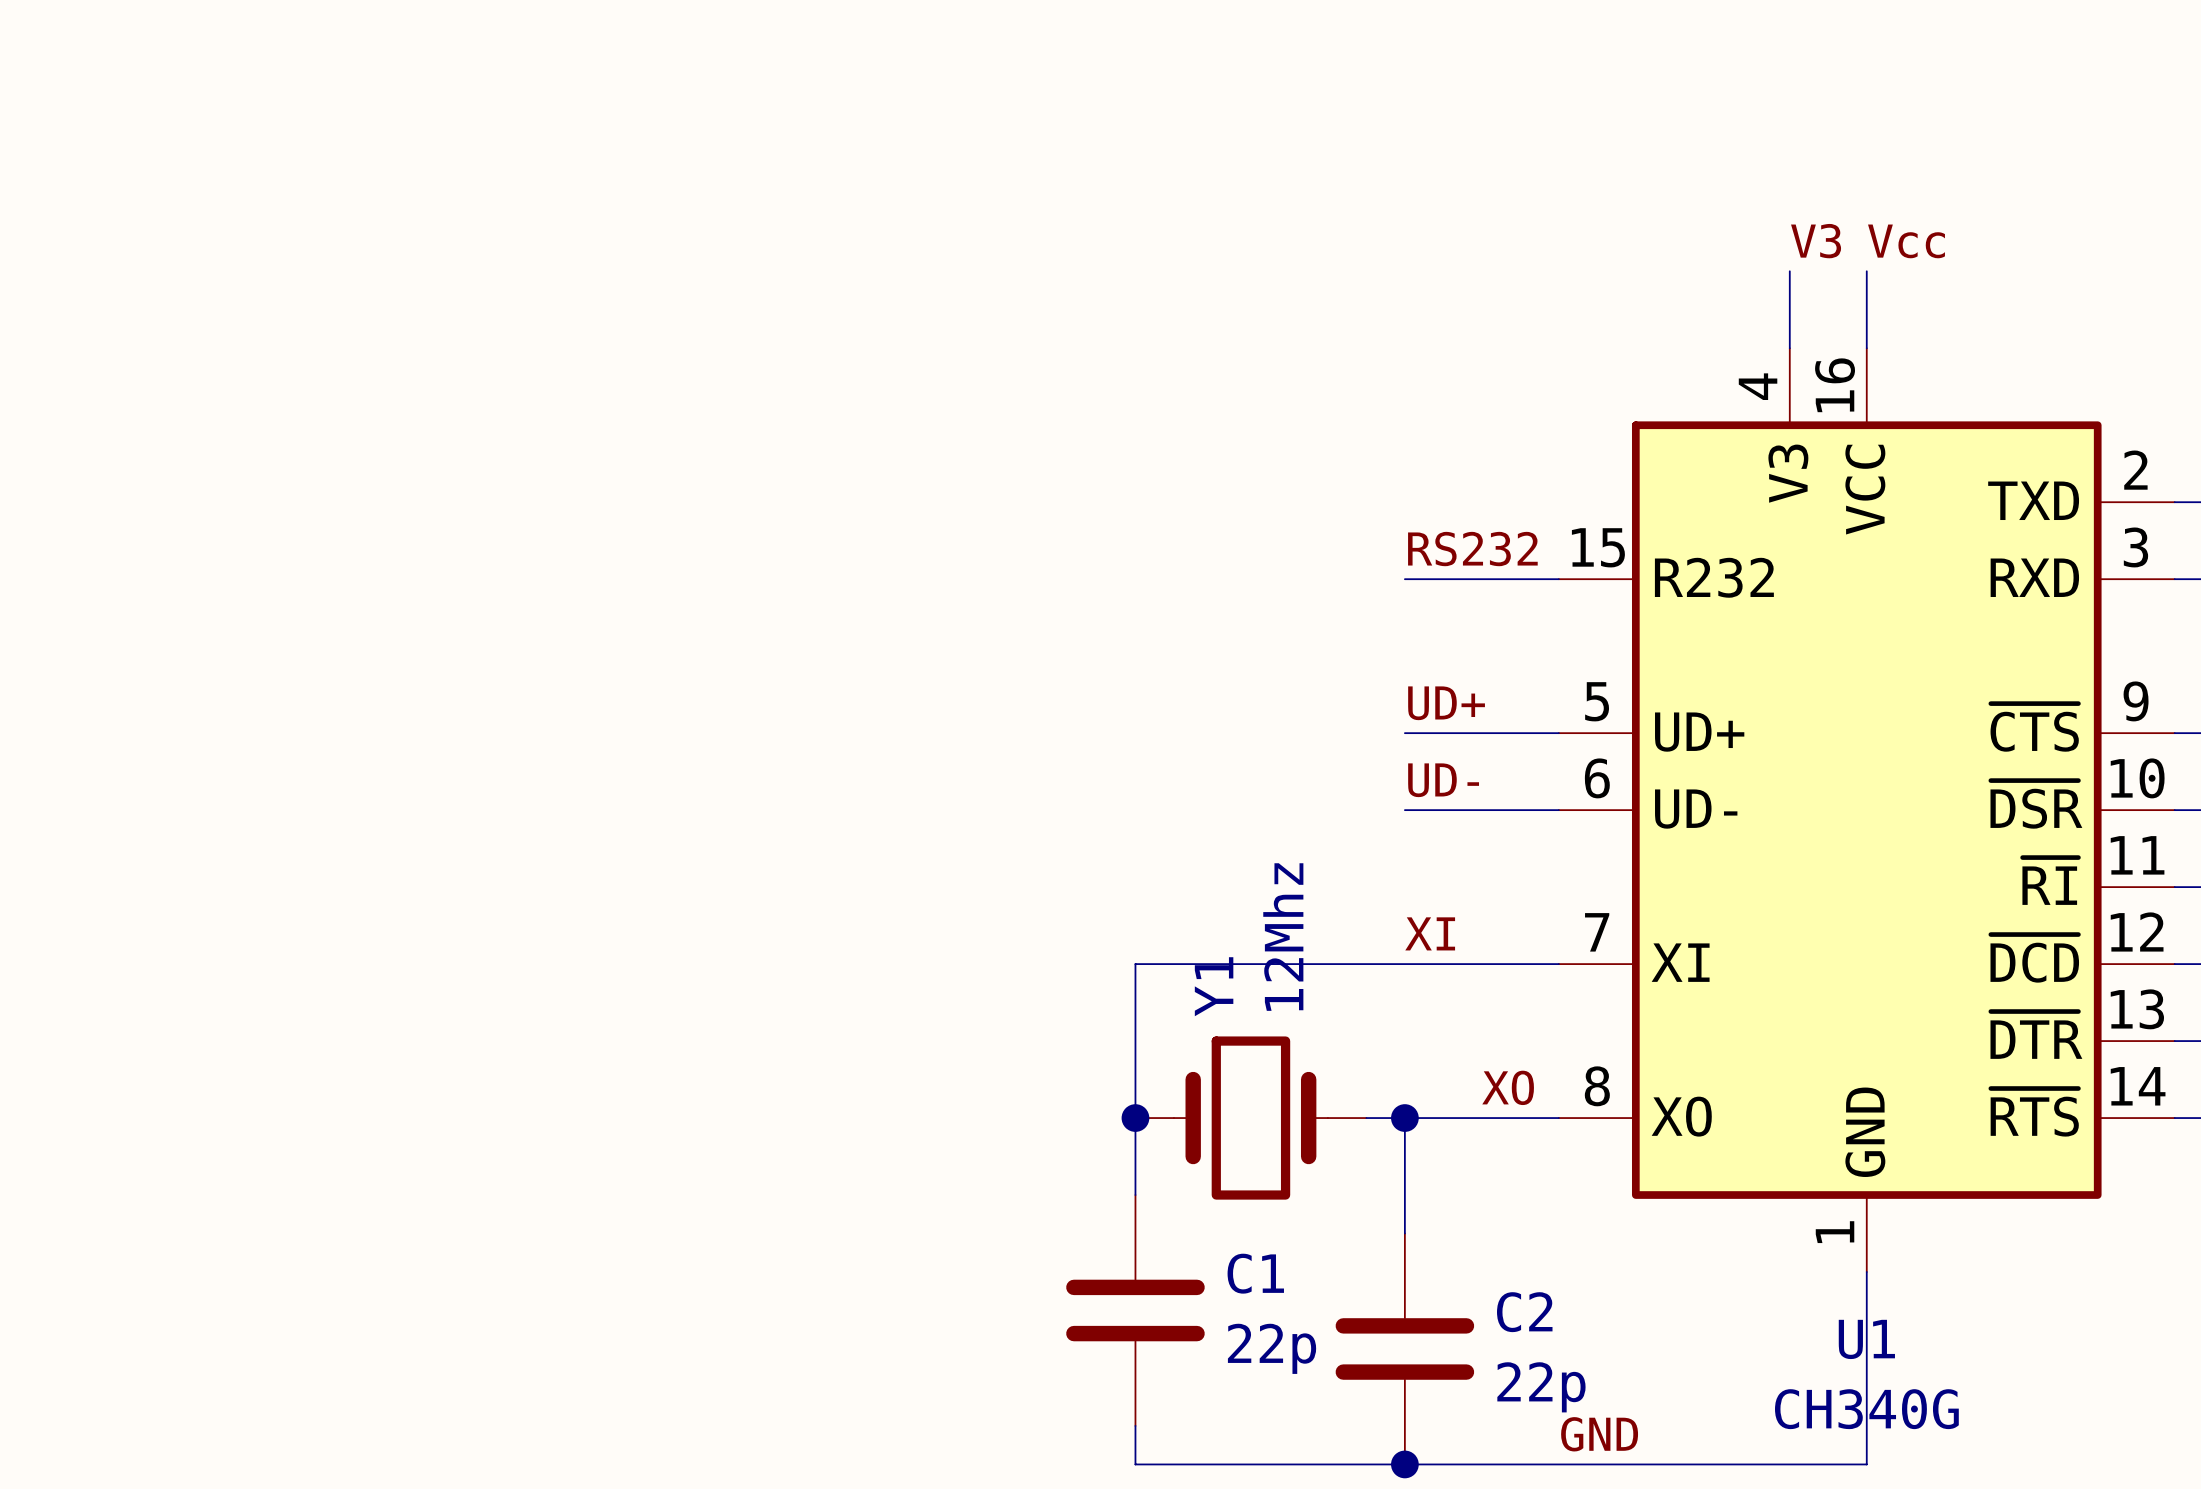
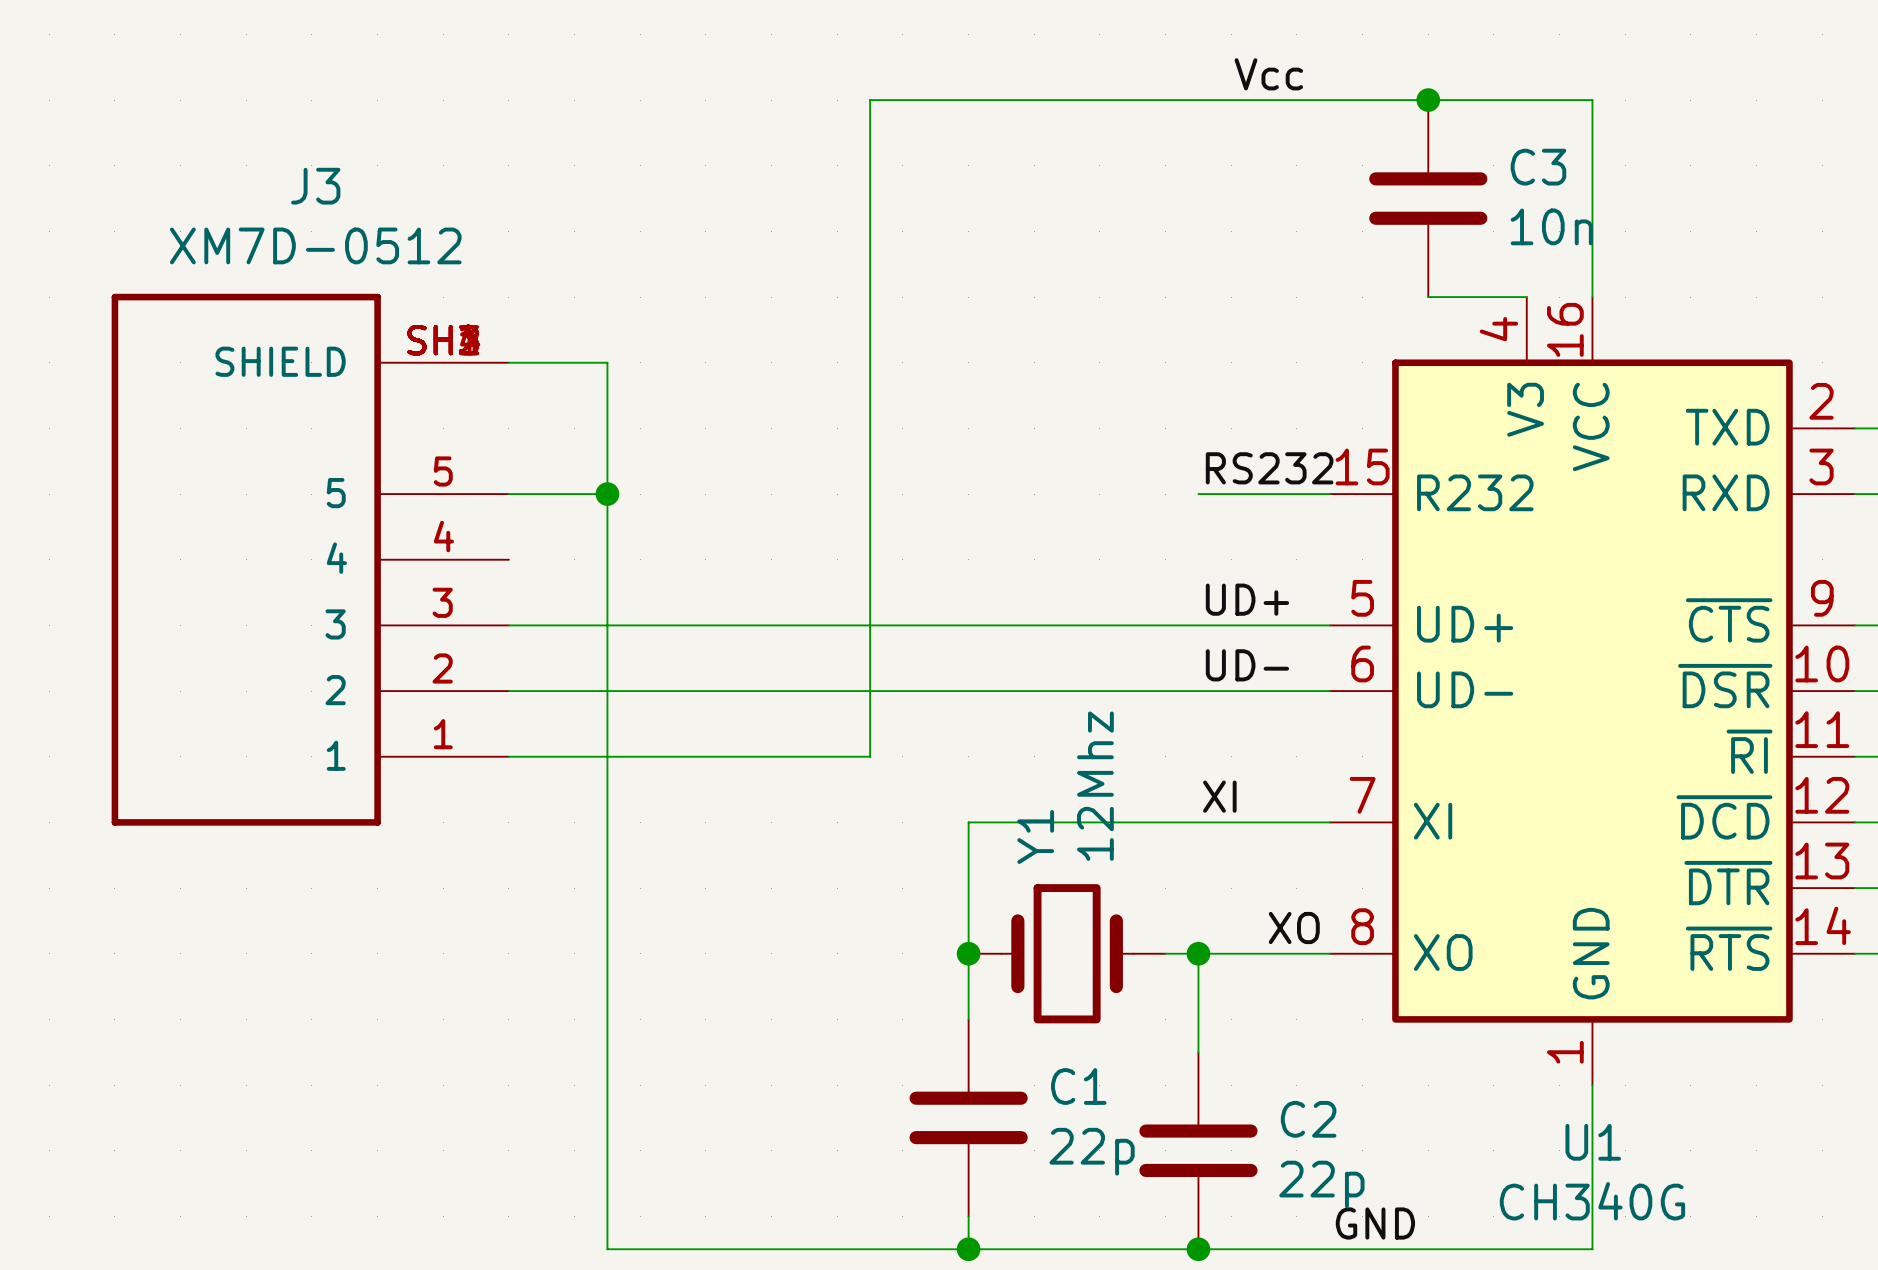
junction: none -> (1428, 100)
C3: none -> 10n (1428, 198)
label: V3 (1816, 241) -> none
label position: Vcc (1906, 241) -> Vcc (1268, 74)
wire: (1789, 271) (1789, 348) -> (1428, 297) (1526, 297)
wire: none -> (1592, 231) (1592, 100) (870, 100) (870, 756) (508, 756)
wire: none -> (508, 362) (607, 362) (607, 1249) (968, 1249)
wire: none -> (508, 494) (607, 494)
junction: none -> (607, 494)
J3: none -> XM7D-0512 (310, 559)
wire: none -> (508, 625) (1198, 625)
wire: none -> (508, 691) (1198, 691)
junction: none -> (968, 1249)

